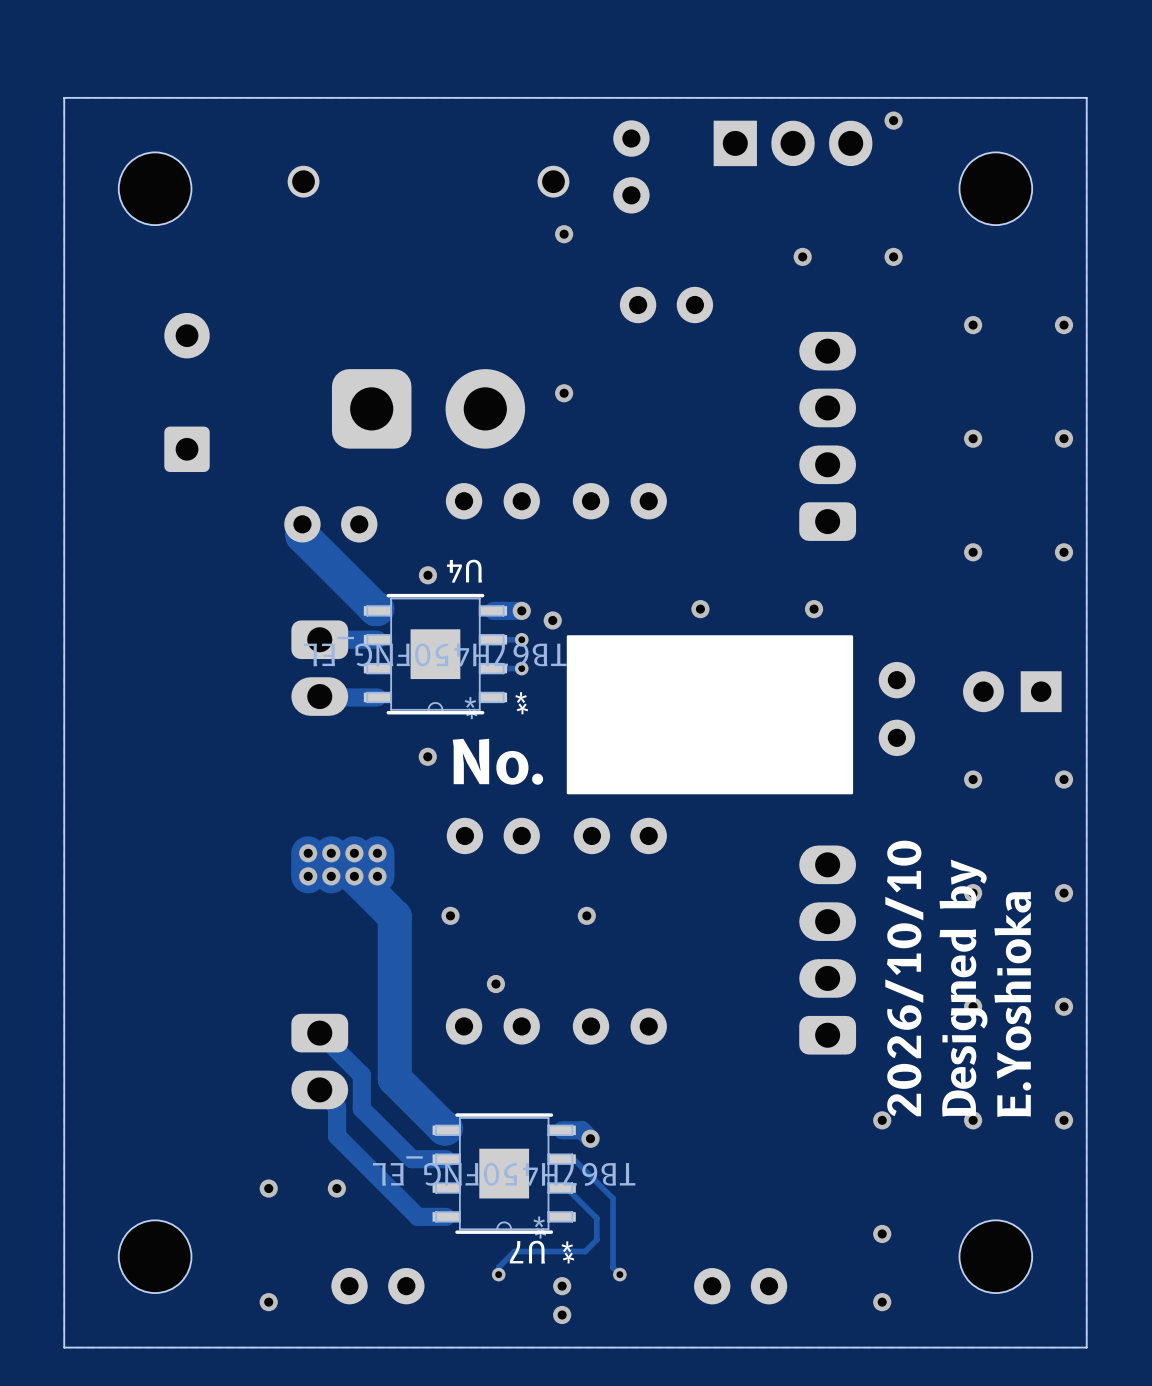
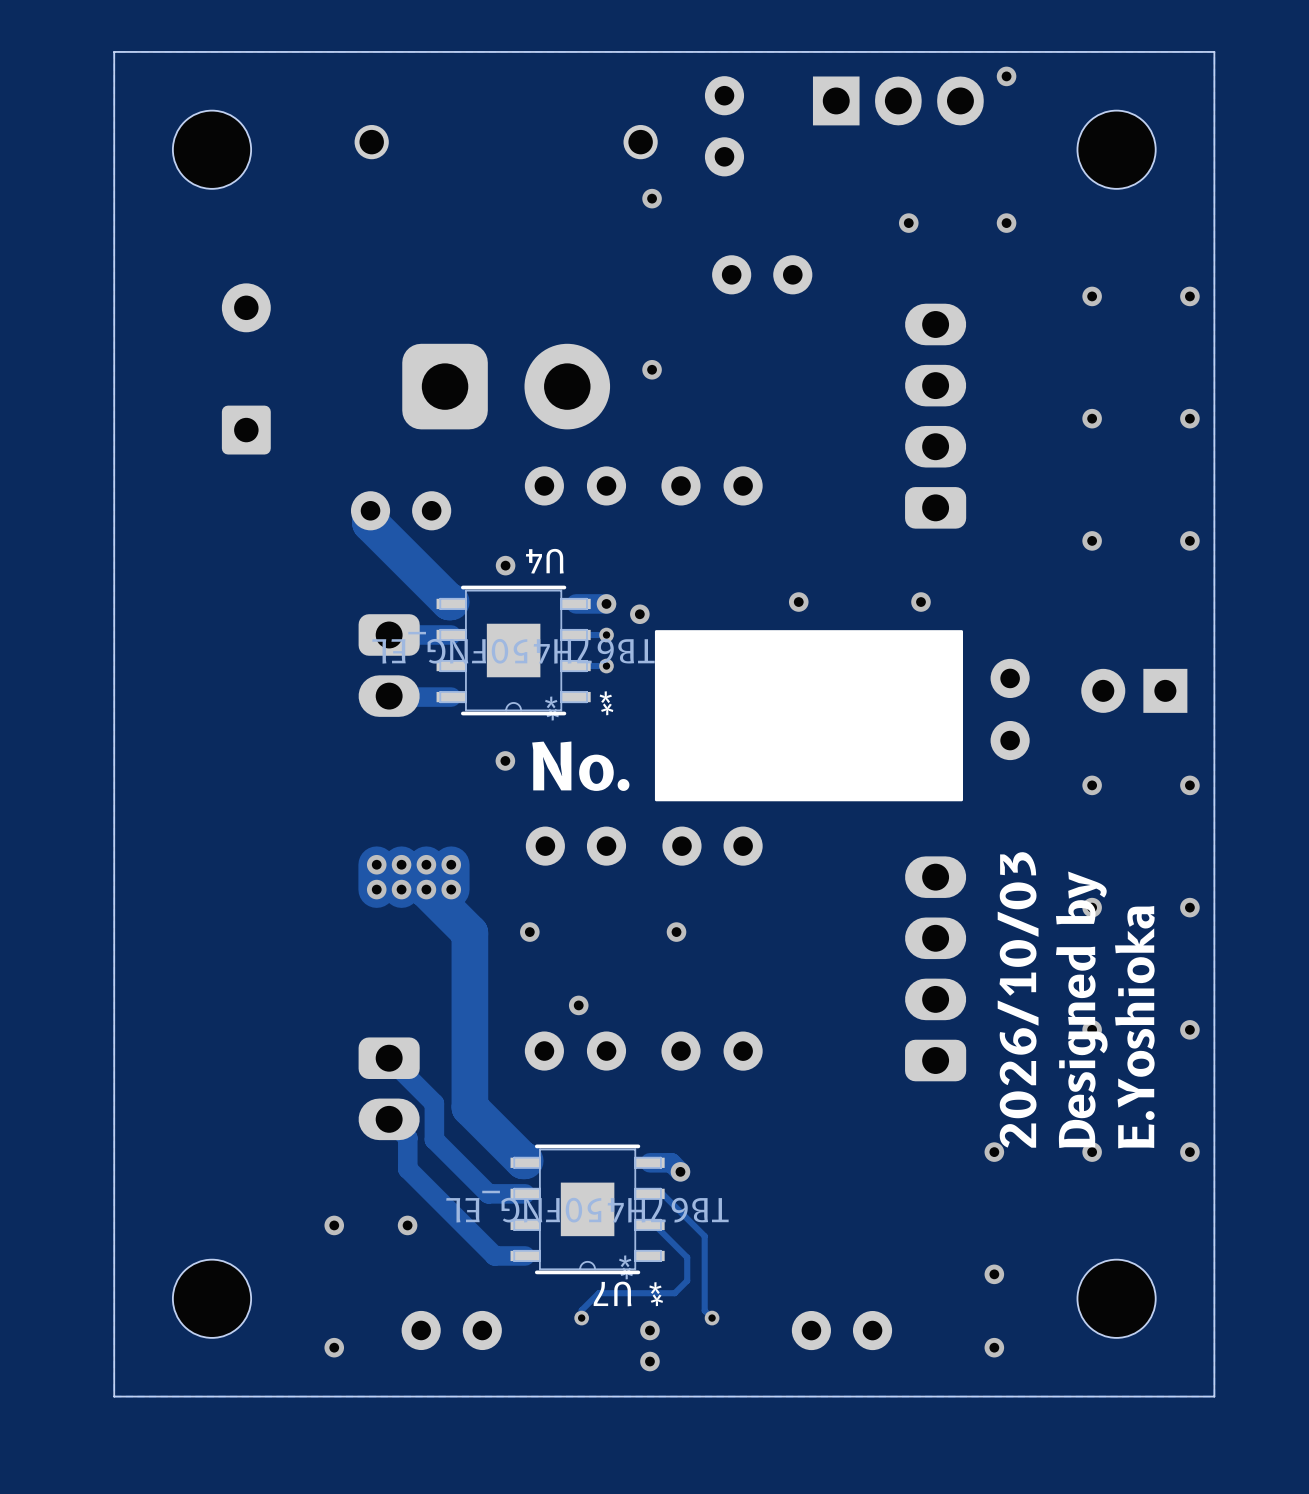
text: 2026/10/10 (904, 978) -> 2026/10/03 (1018, 999)

